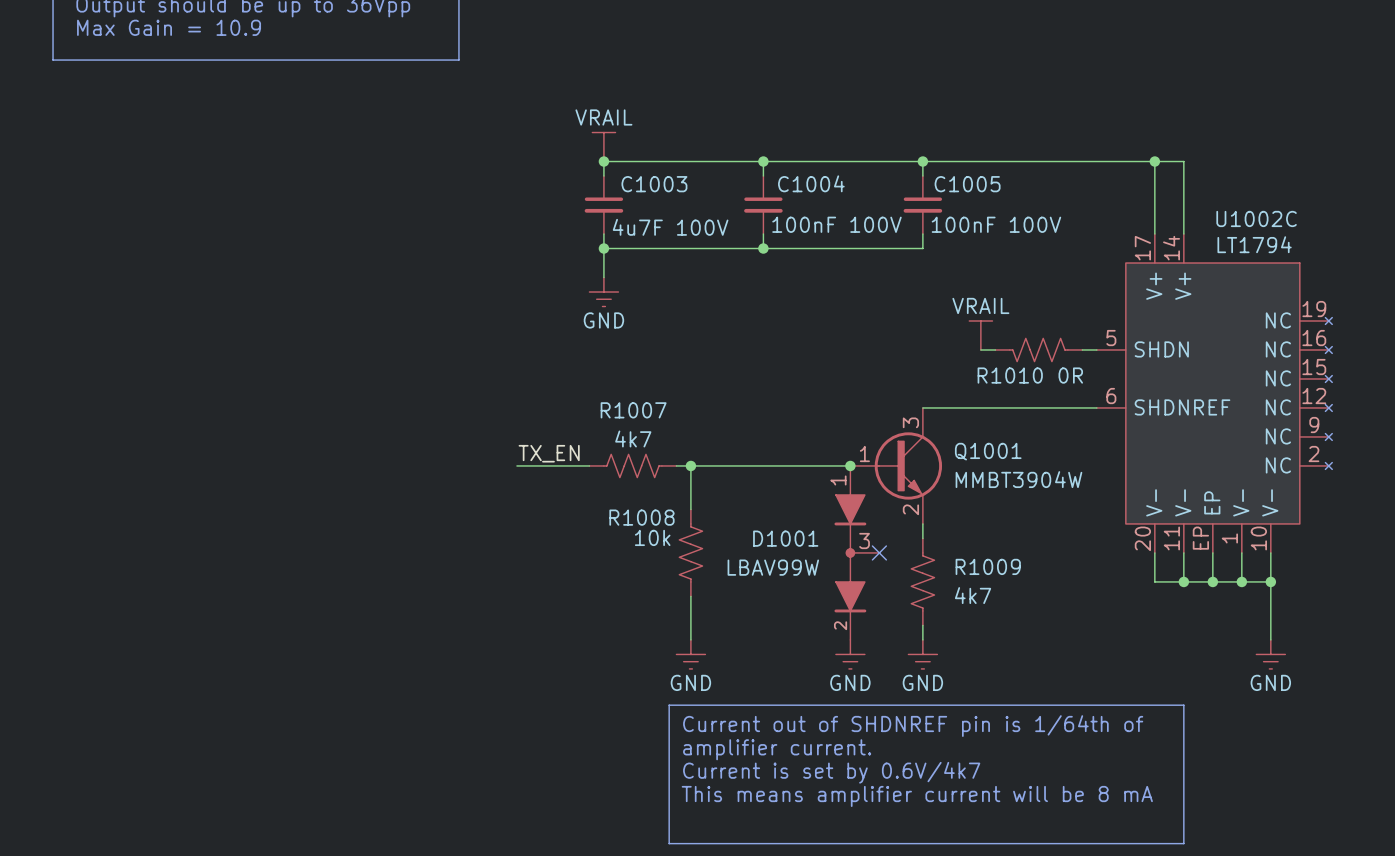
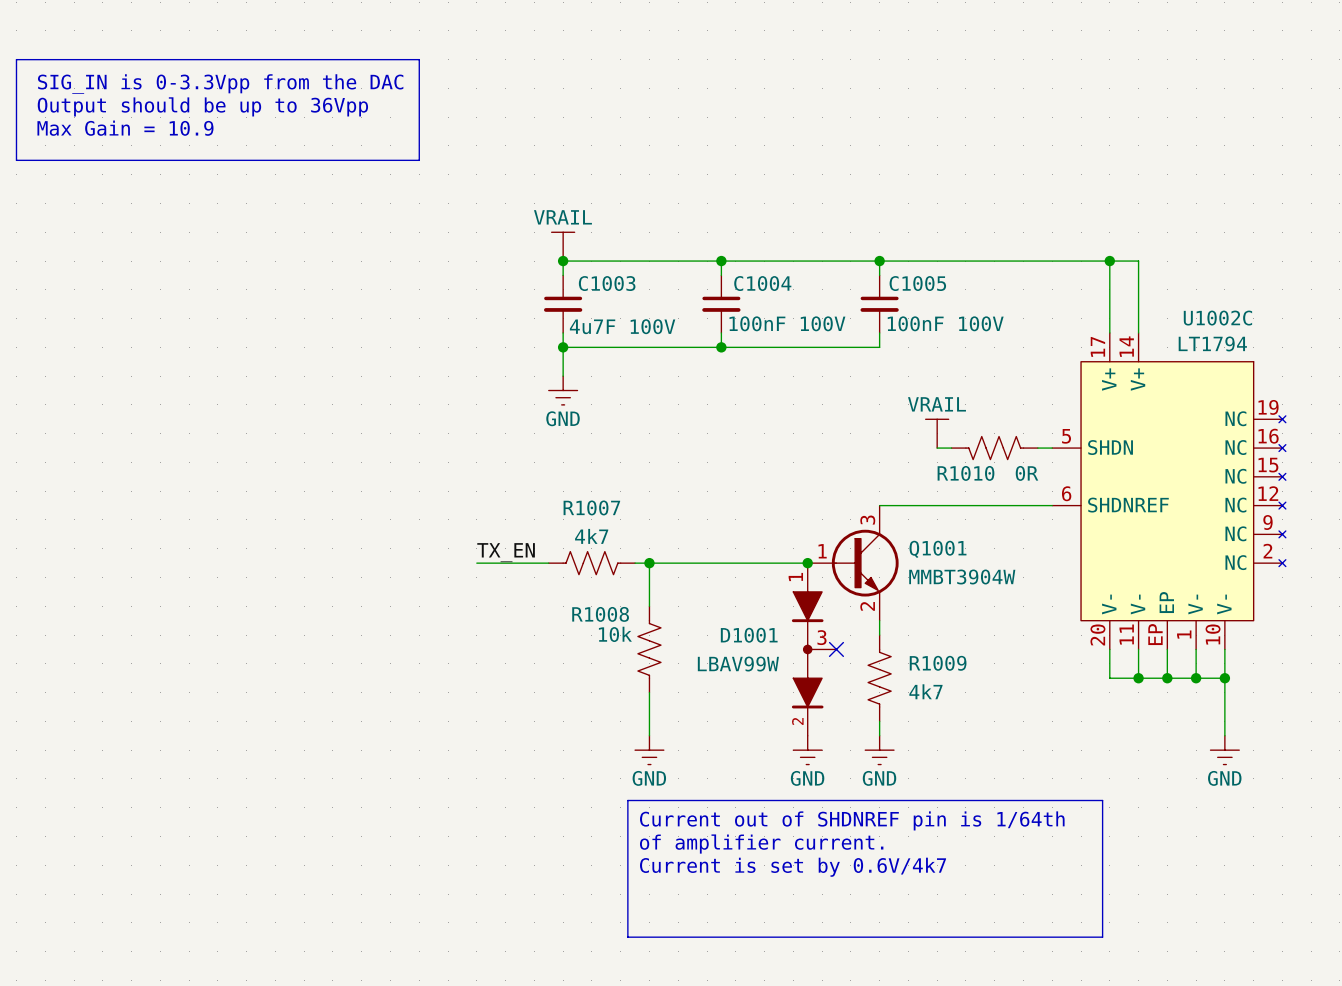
line: (1147, 705) (1183, 705) (1183, 843) (669, 842) -> (1102, 800) (1102, 937) (627, 937)
text: Current out of SHDNREF pin is 1/64th of (913, 726) -> Current out of SHDNREF pin is 1/64th (852, 820)
text: amplifier current. (777, 749) -> of amplifier current. (761, 844)
text: This means amplifier current will be 8 mA (917, 796) -> none

